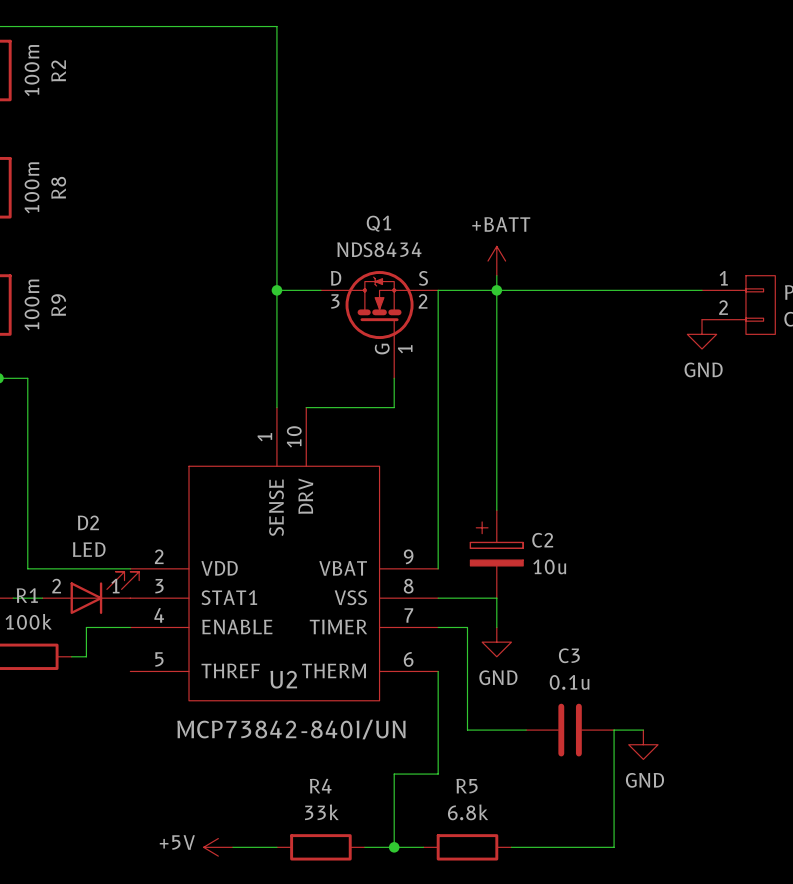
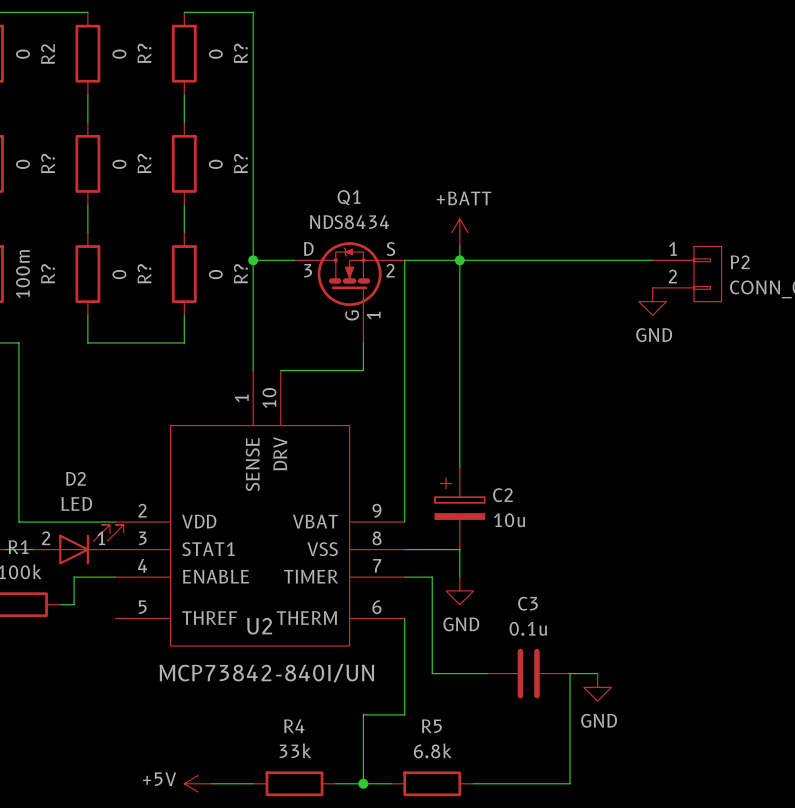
wire: (101, 26) (203, 26) -> none
R2 value: 100m (32, 70) -> 0 (22, 54)
R?: none -> 0 (87, 53)
R?: none -> 0 (184, 53)
wire: none -> (87, 95) (87, 122)
wire: none -> (184, 95) (184, 122)
R8 value: 100m (32, 187) -> 0 (22, 164)
R8 name: R8 (58, 187) -> R? (48, 163)
R?: none -> 0 (87, 163)
R?: none -> 0 (184, 163)
wire: none -> (87, 205) (87, 232)
wire: none -> (184, 205) (184, 232)
R9 name: R9 (58, 305) -> R? (48, 273)
R?: none -> 0 (87, 274)
R?: none -> 0 (184, 274)
wire: none -> (87, 315) (87, 342) (184, 342) (184, 315)

